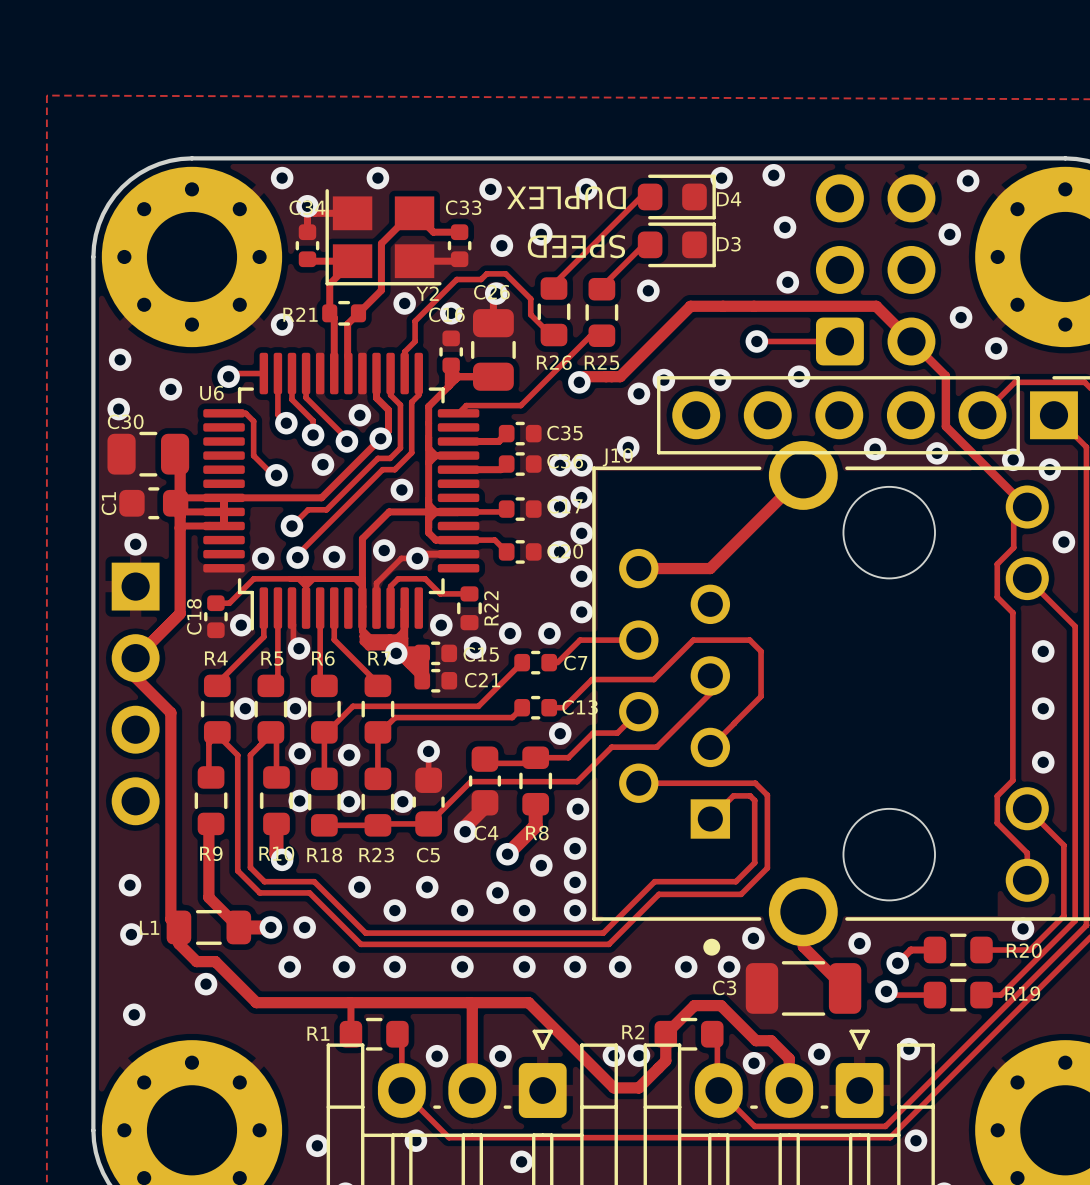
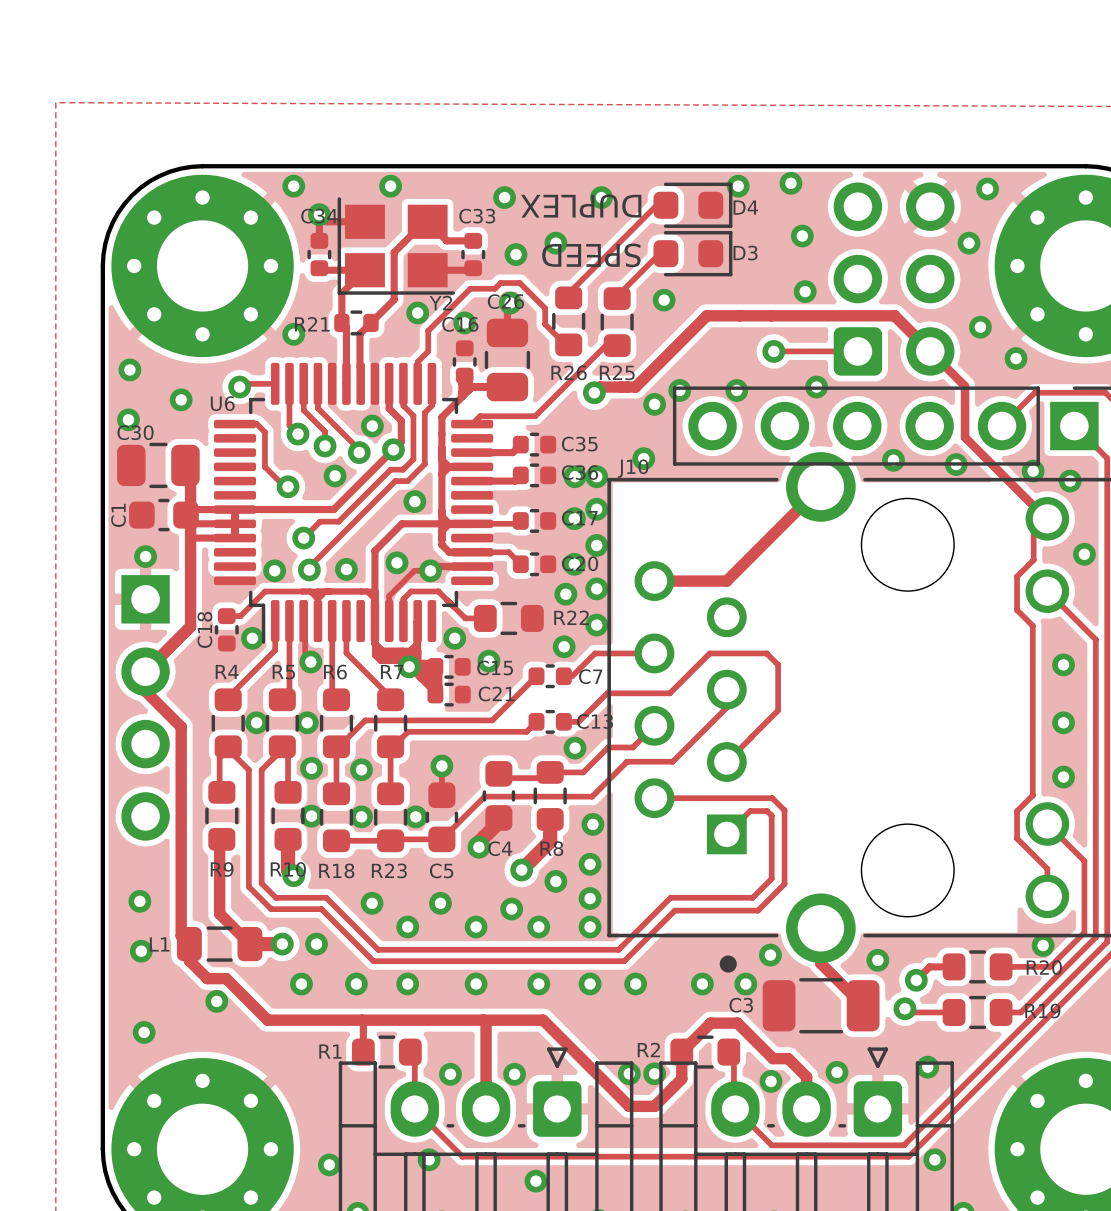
R22 footprint: [457, 586, 482, 631] -> [473, 601, 544, 636]
track: none -> (447, 600) (465, 618) (485, 618)
track: (440, 593) (469, 593) -> none
via position: (510, 633) -> (565, 594)

